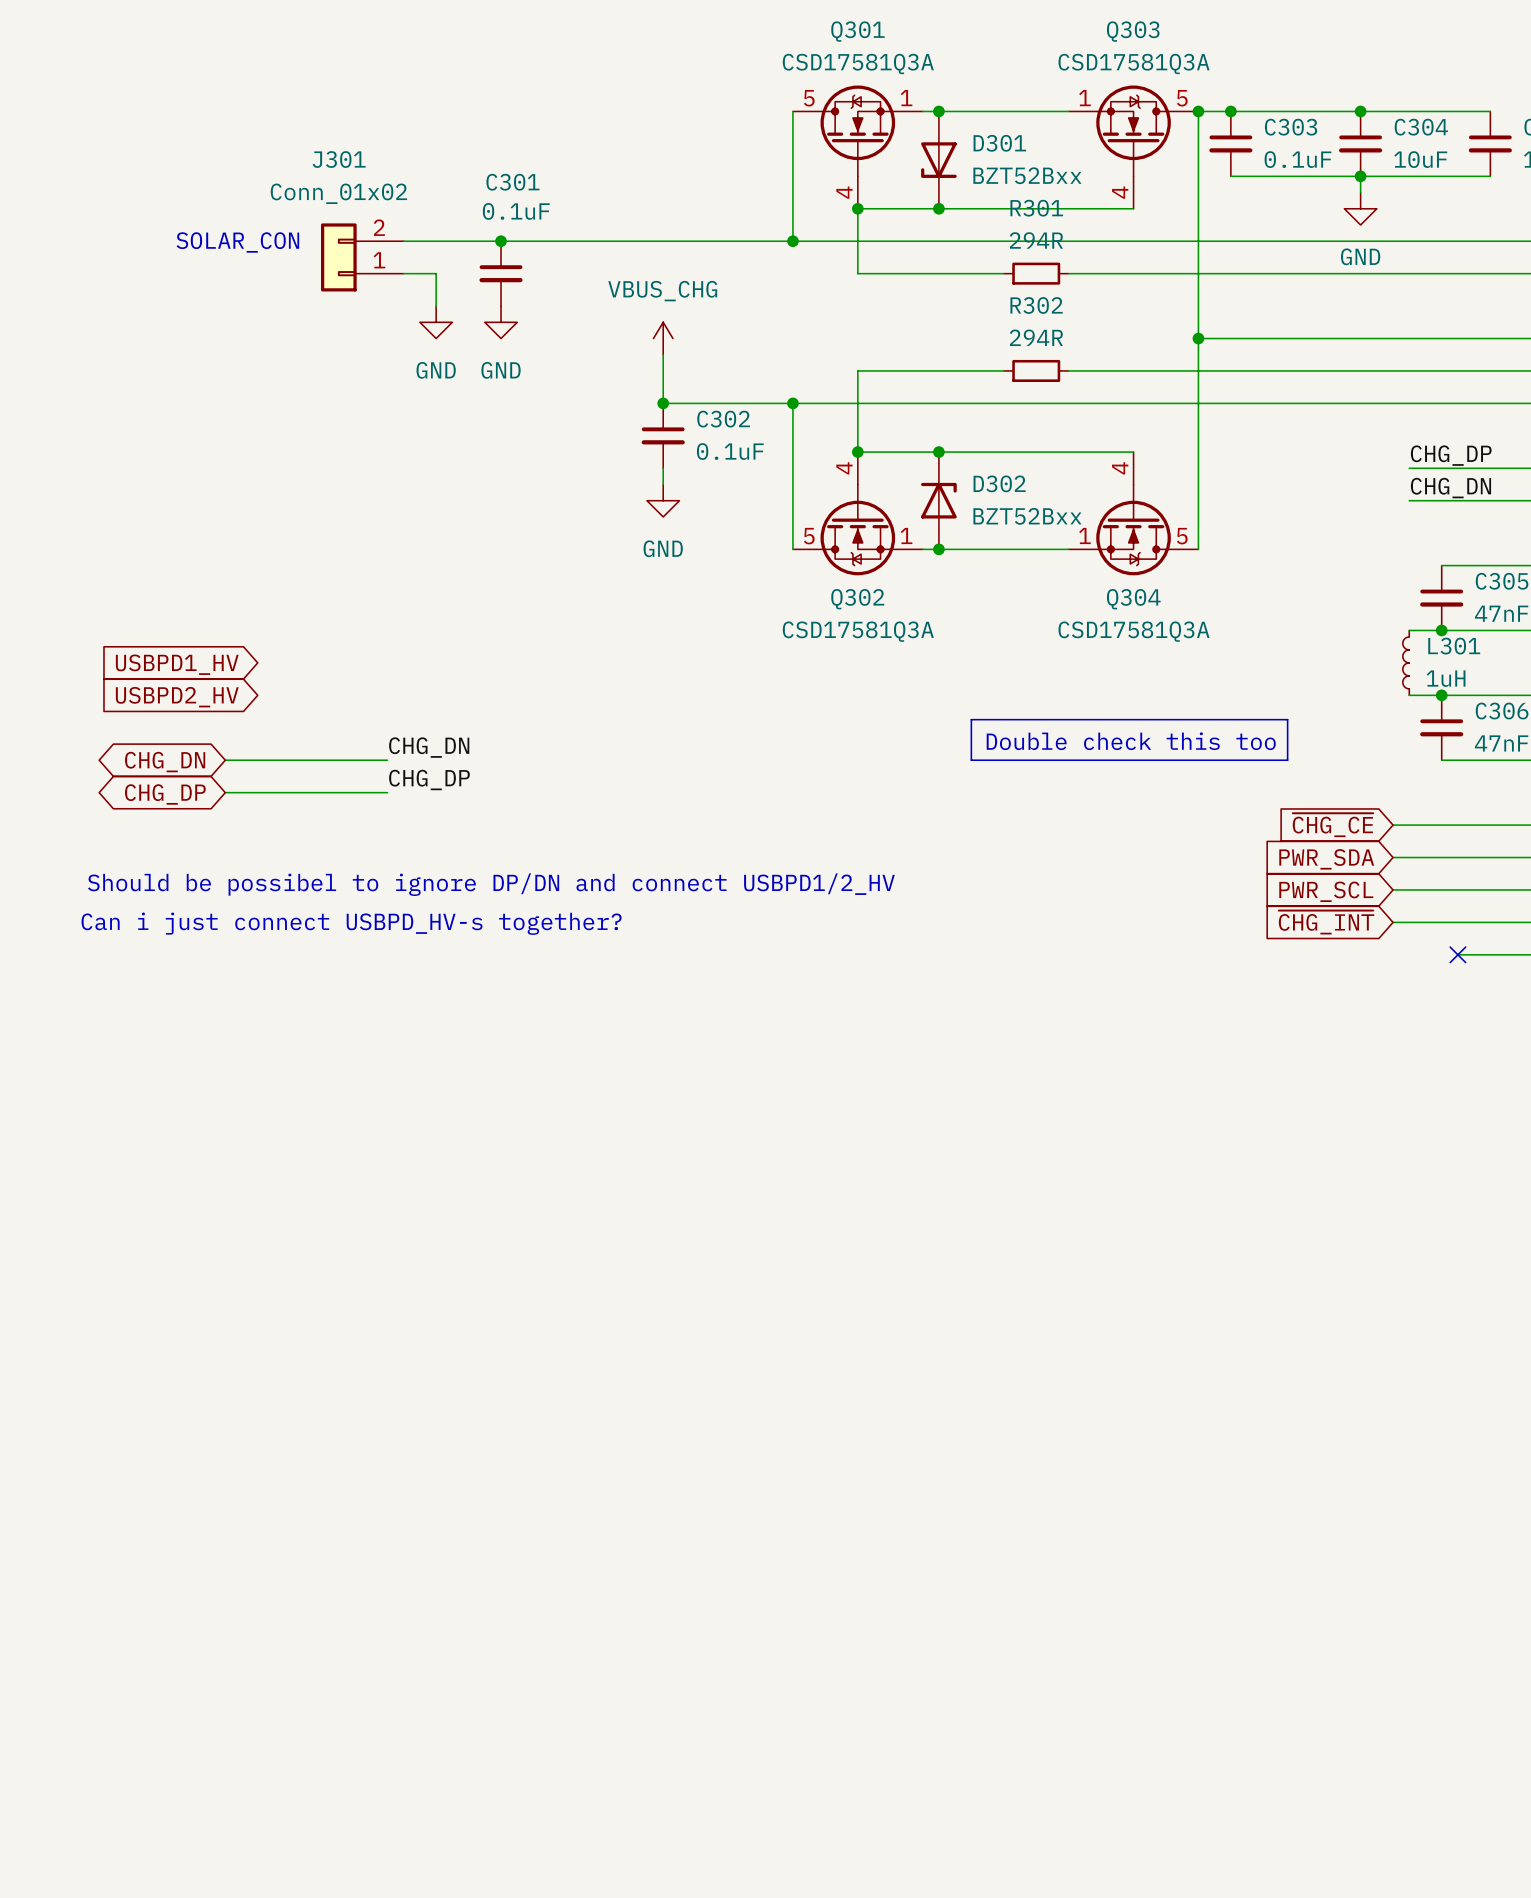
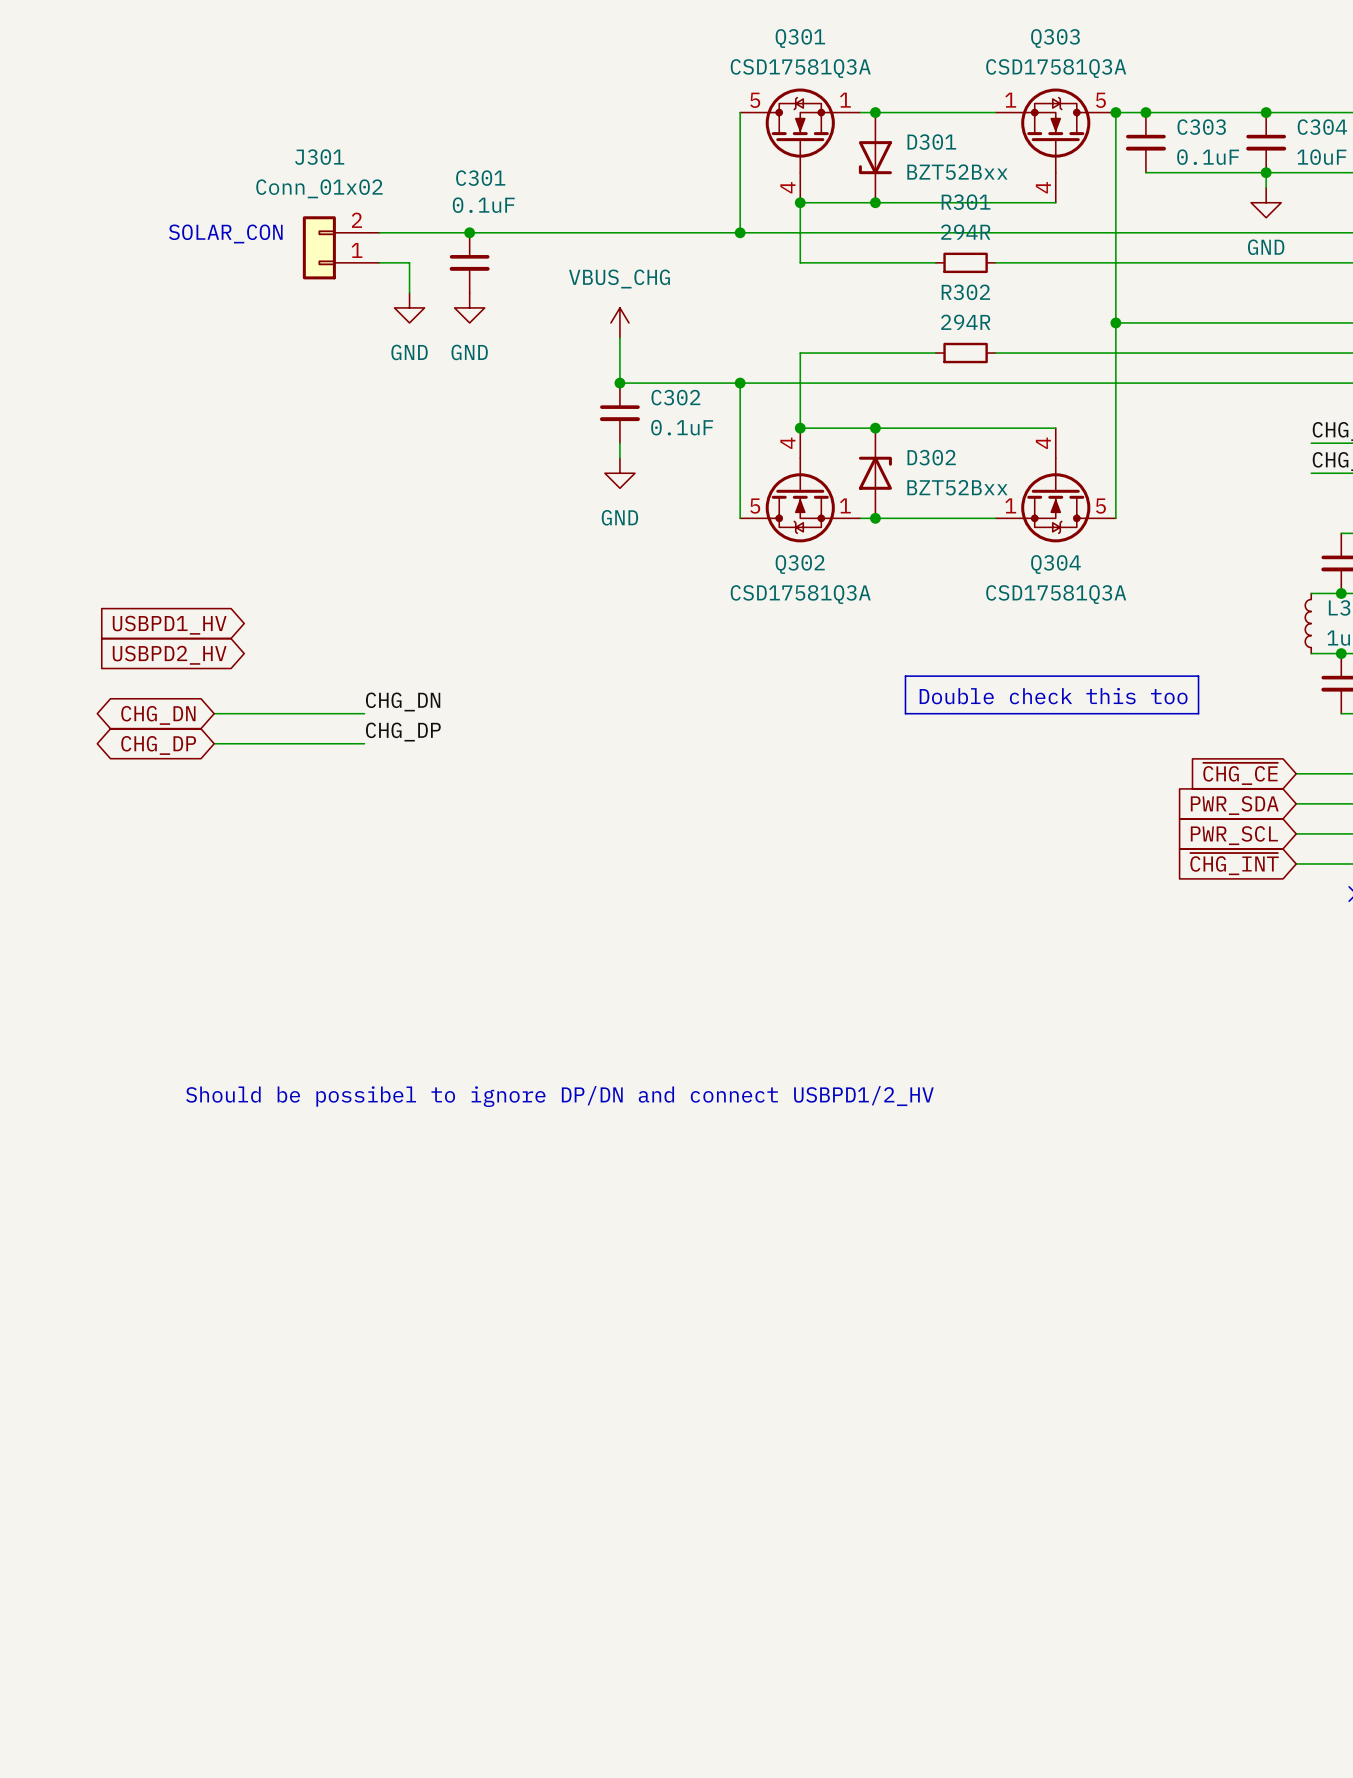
text position: Should be possibel to ignore DP/DN and connect USBPD1/2_HV (491, 884) -> Should be possibel to ignore DP/DN and connect USBPD1/2_HV (559, 1096)
text: Can i just connect USBPD_HV-s together? (351, 923) -> none

